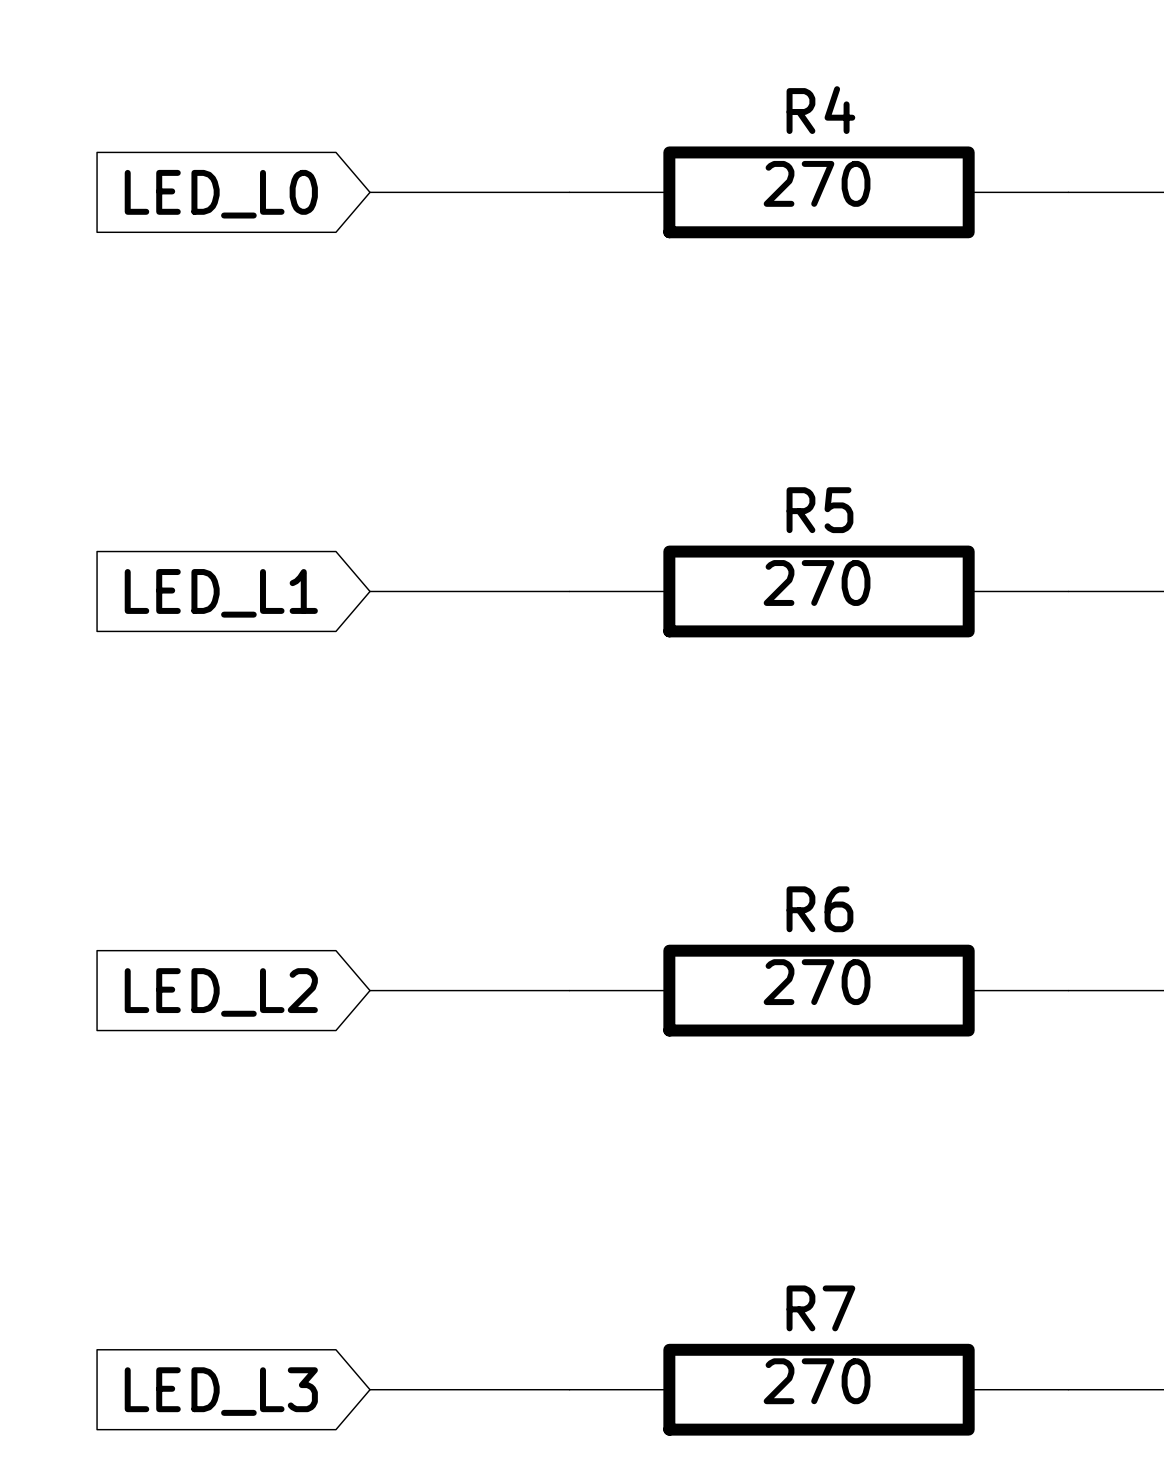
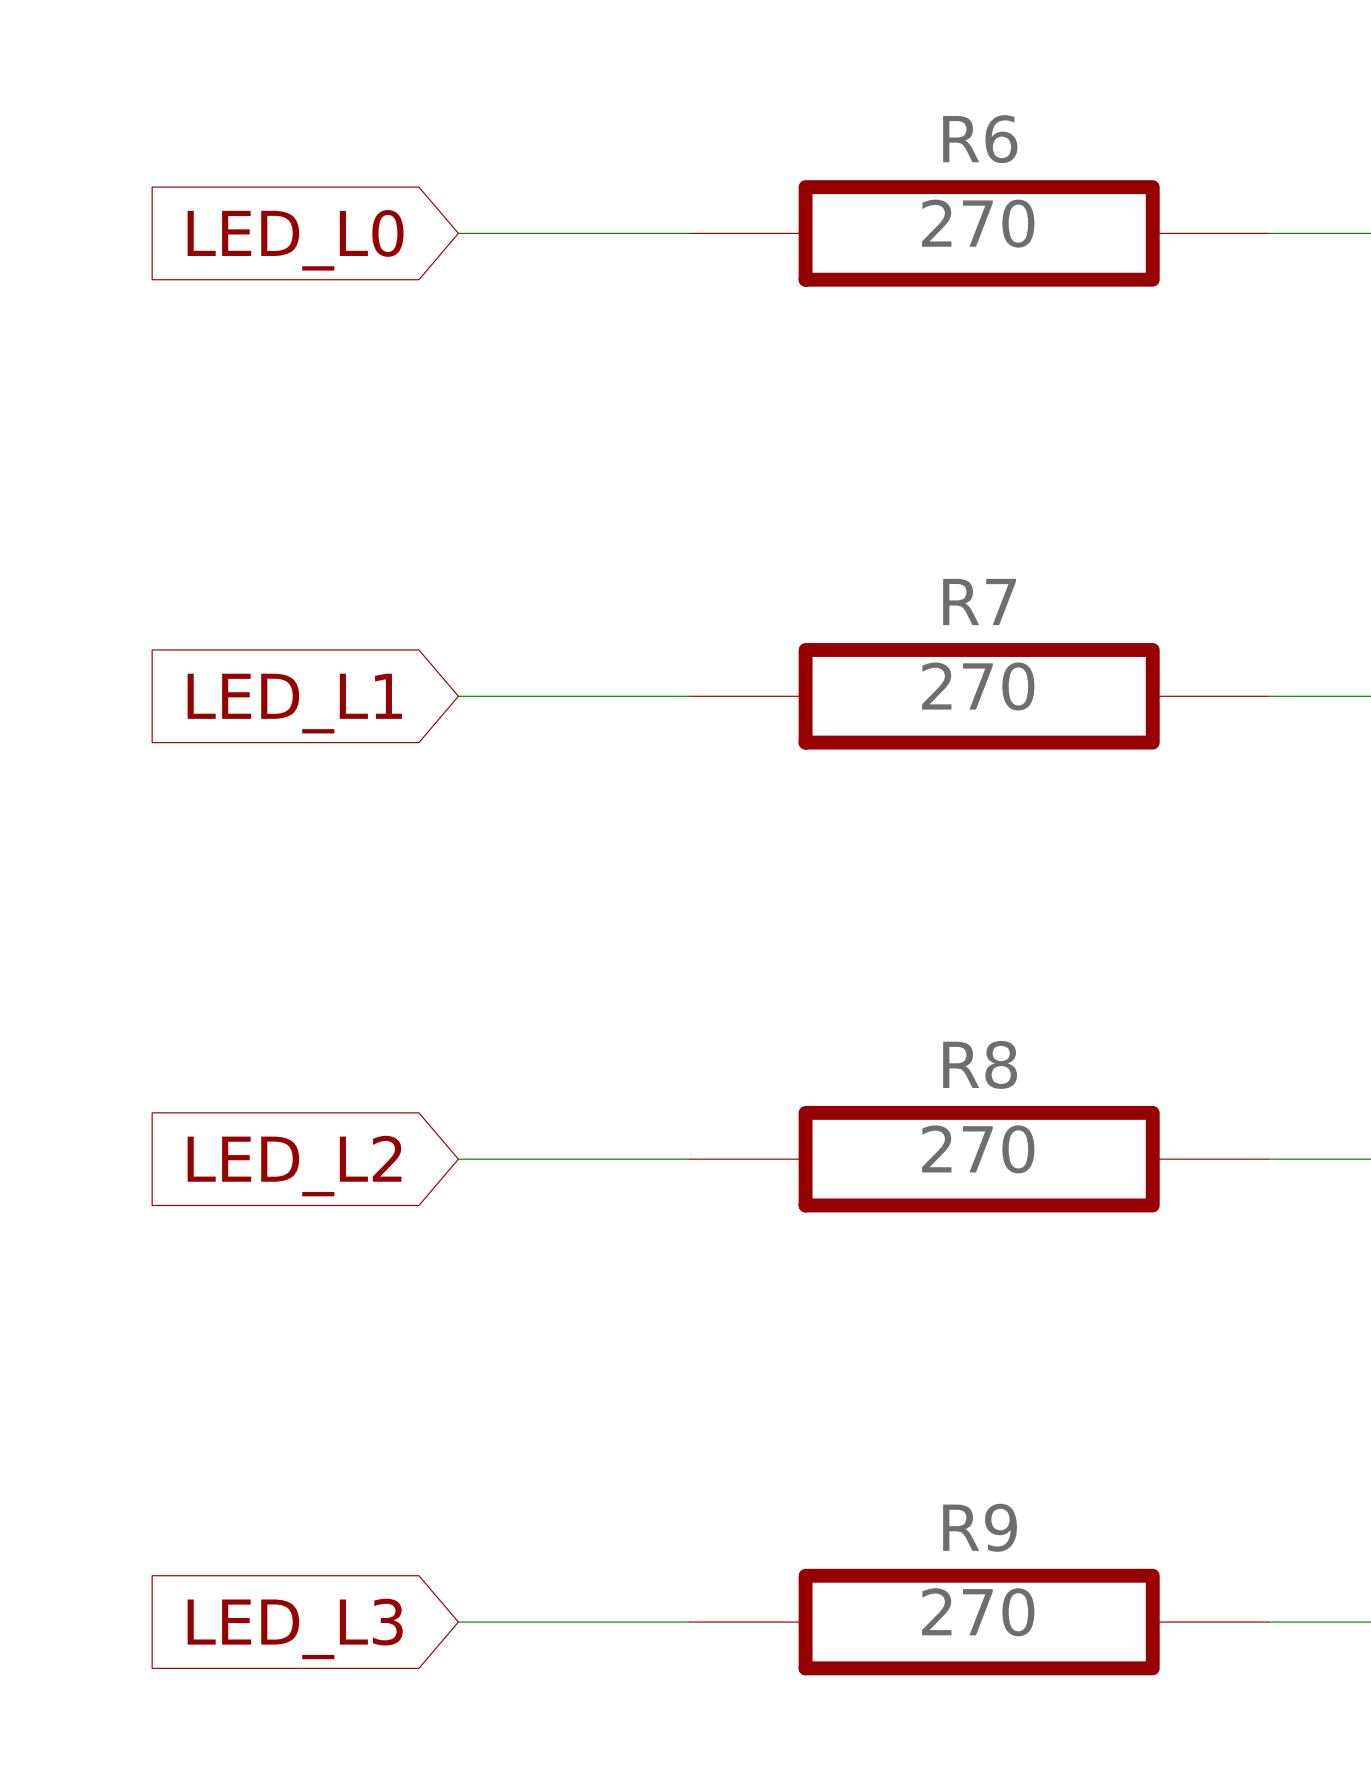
R4 name: R4 (820, 110) -> R6 (980, 139)
R5 name: R5 (819, 510) -> R7 (979, 601)
R6 name: R6 (819, 909) -> R8 (980, 1064)
R7 name: R7 (820, 1308) -> R9 (980, 1527)

